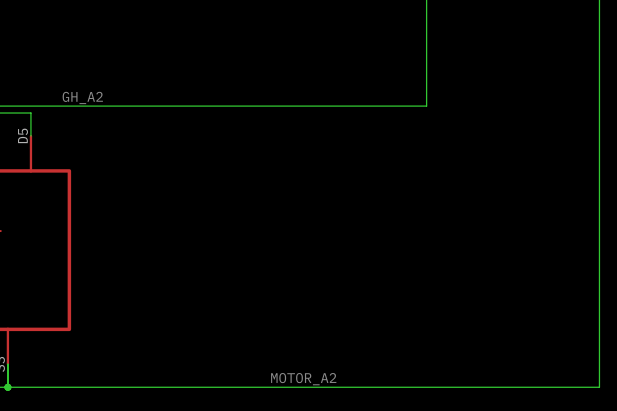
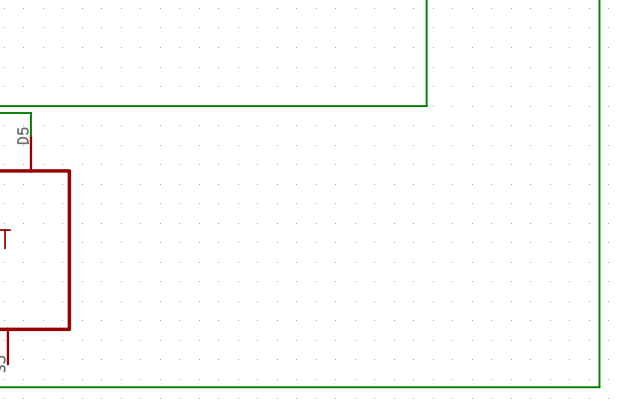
text: GH_A2 (82, 97) -> none
wire: (7, 364) (7, 387) -> none
text: MOTOR_A2 (303, 379) -> none
junction: (7, 387) -> none

